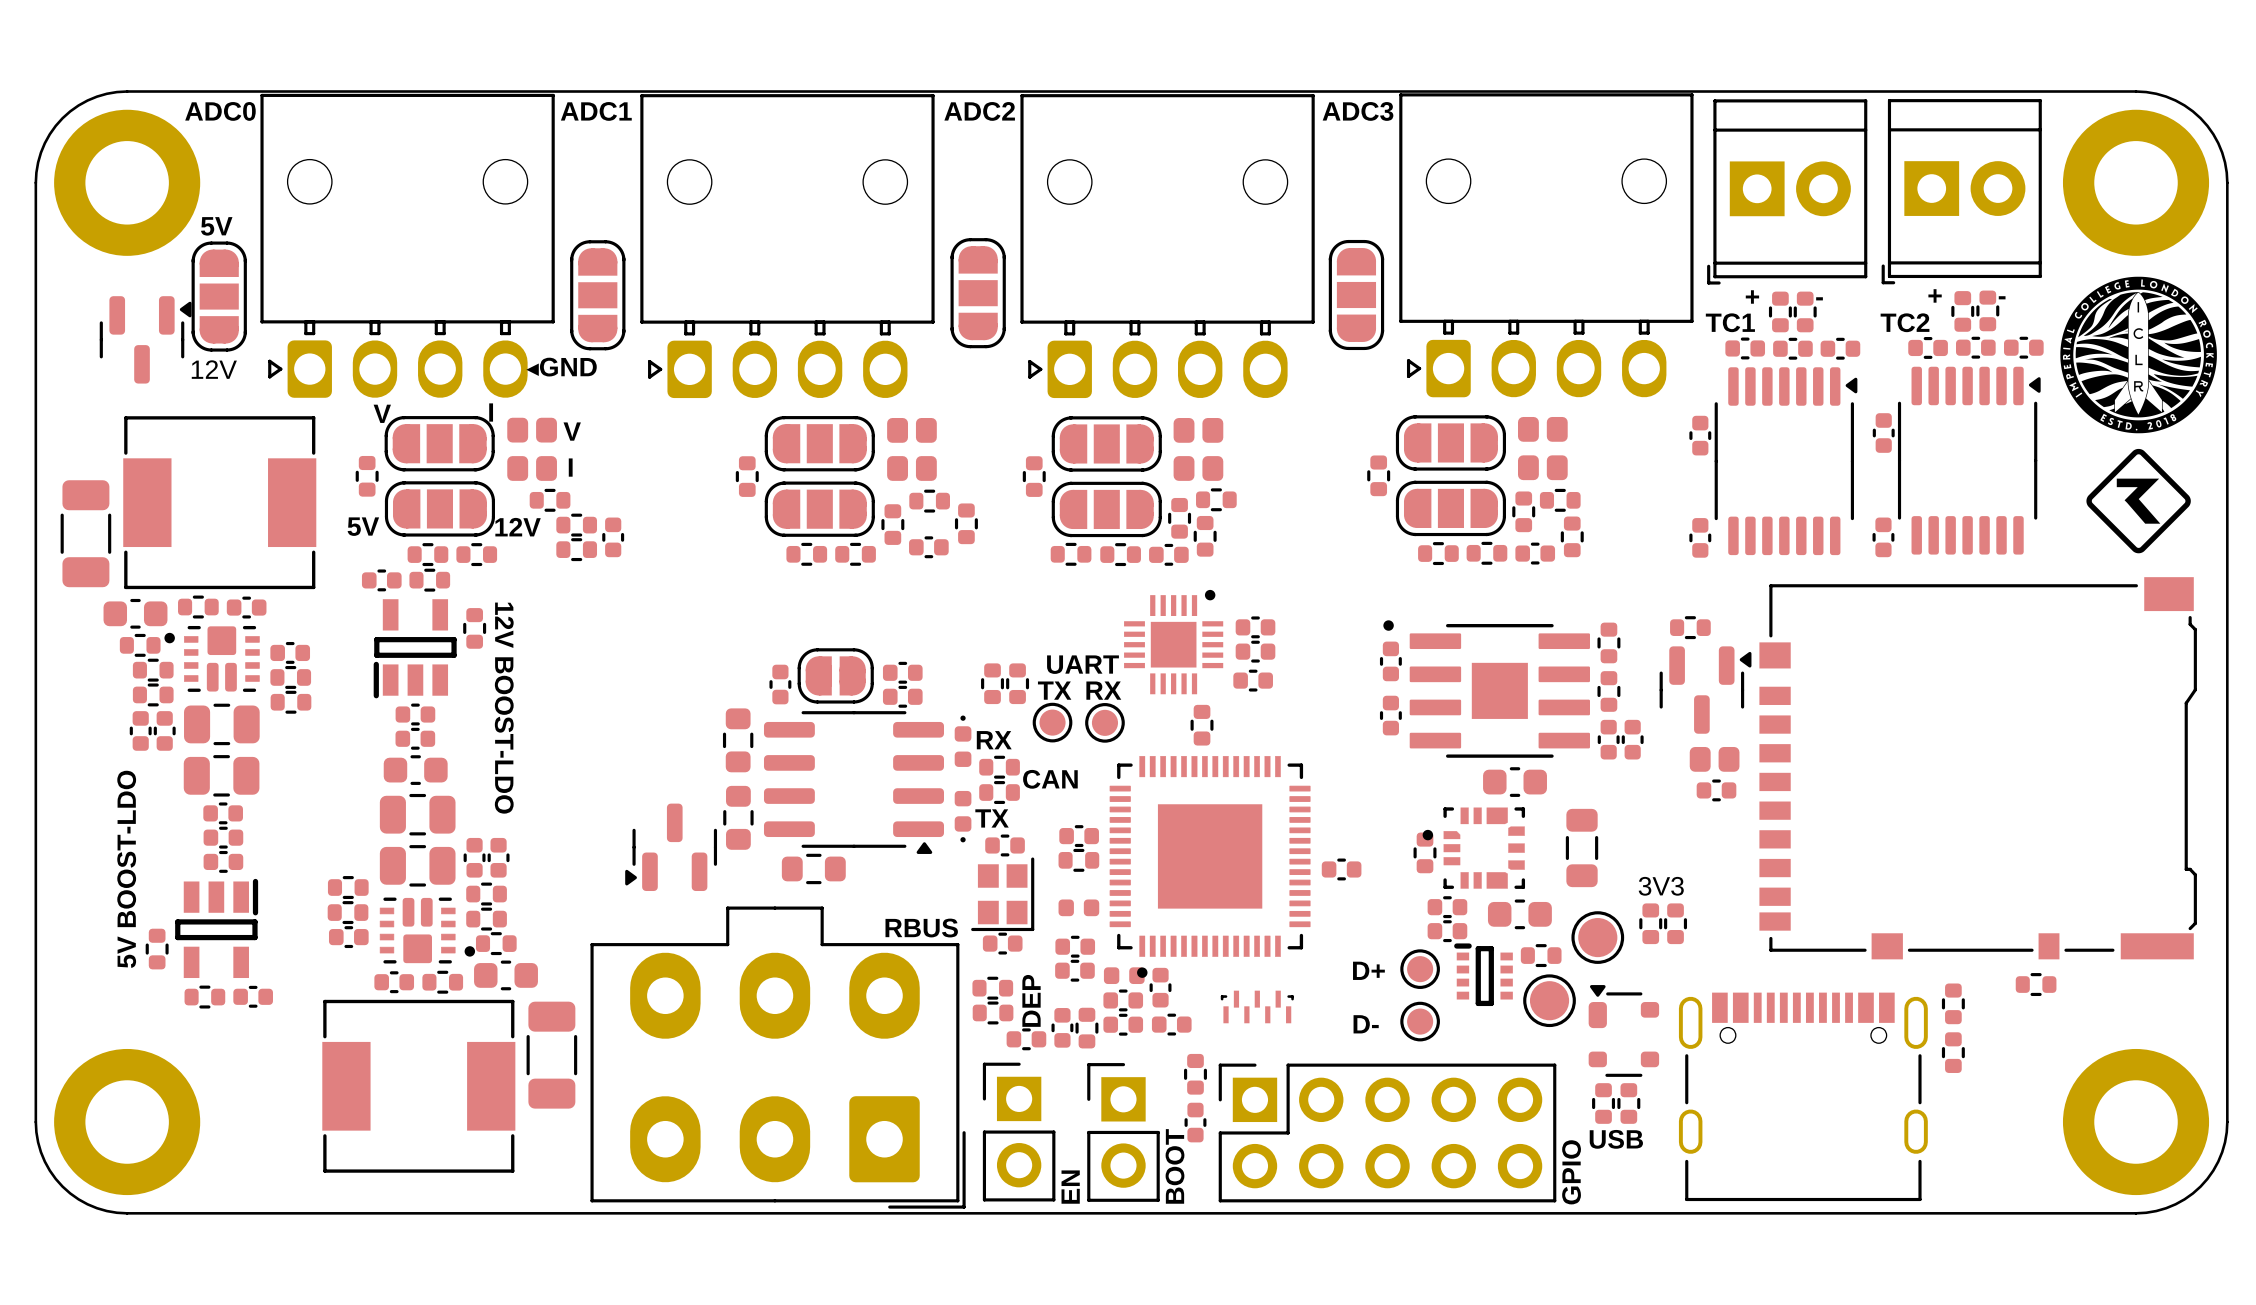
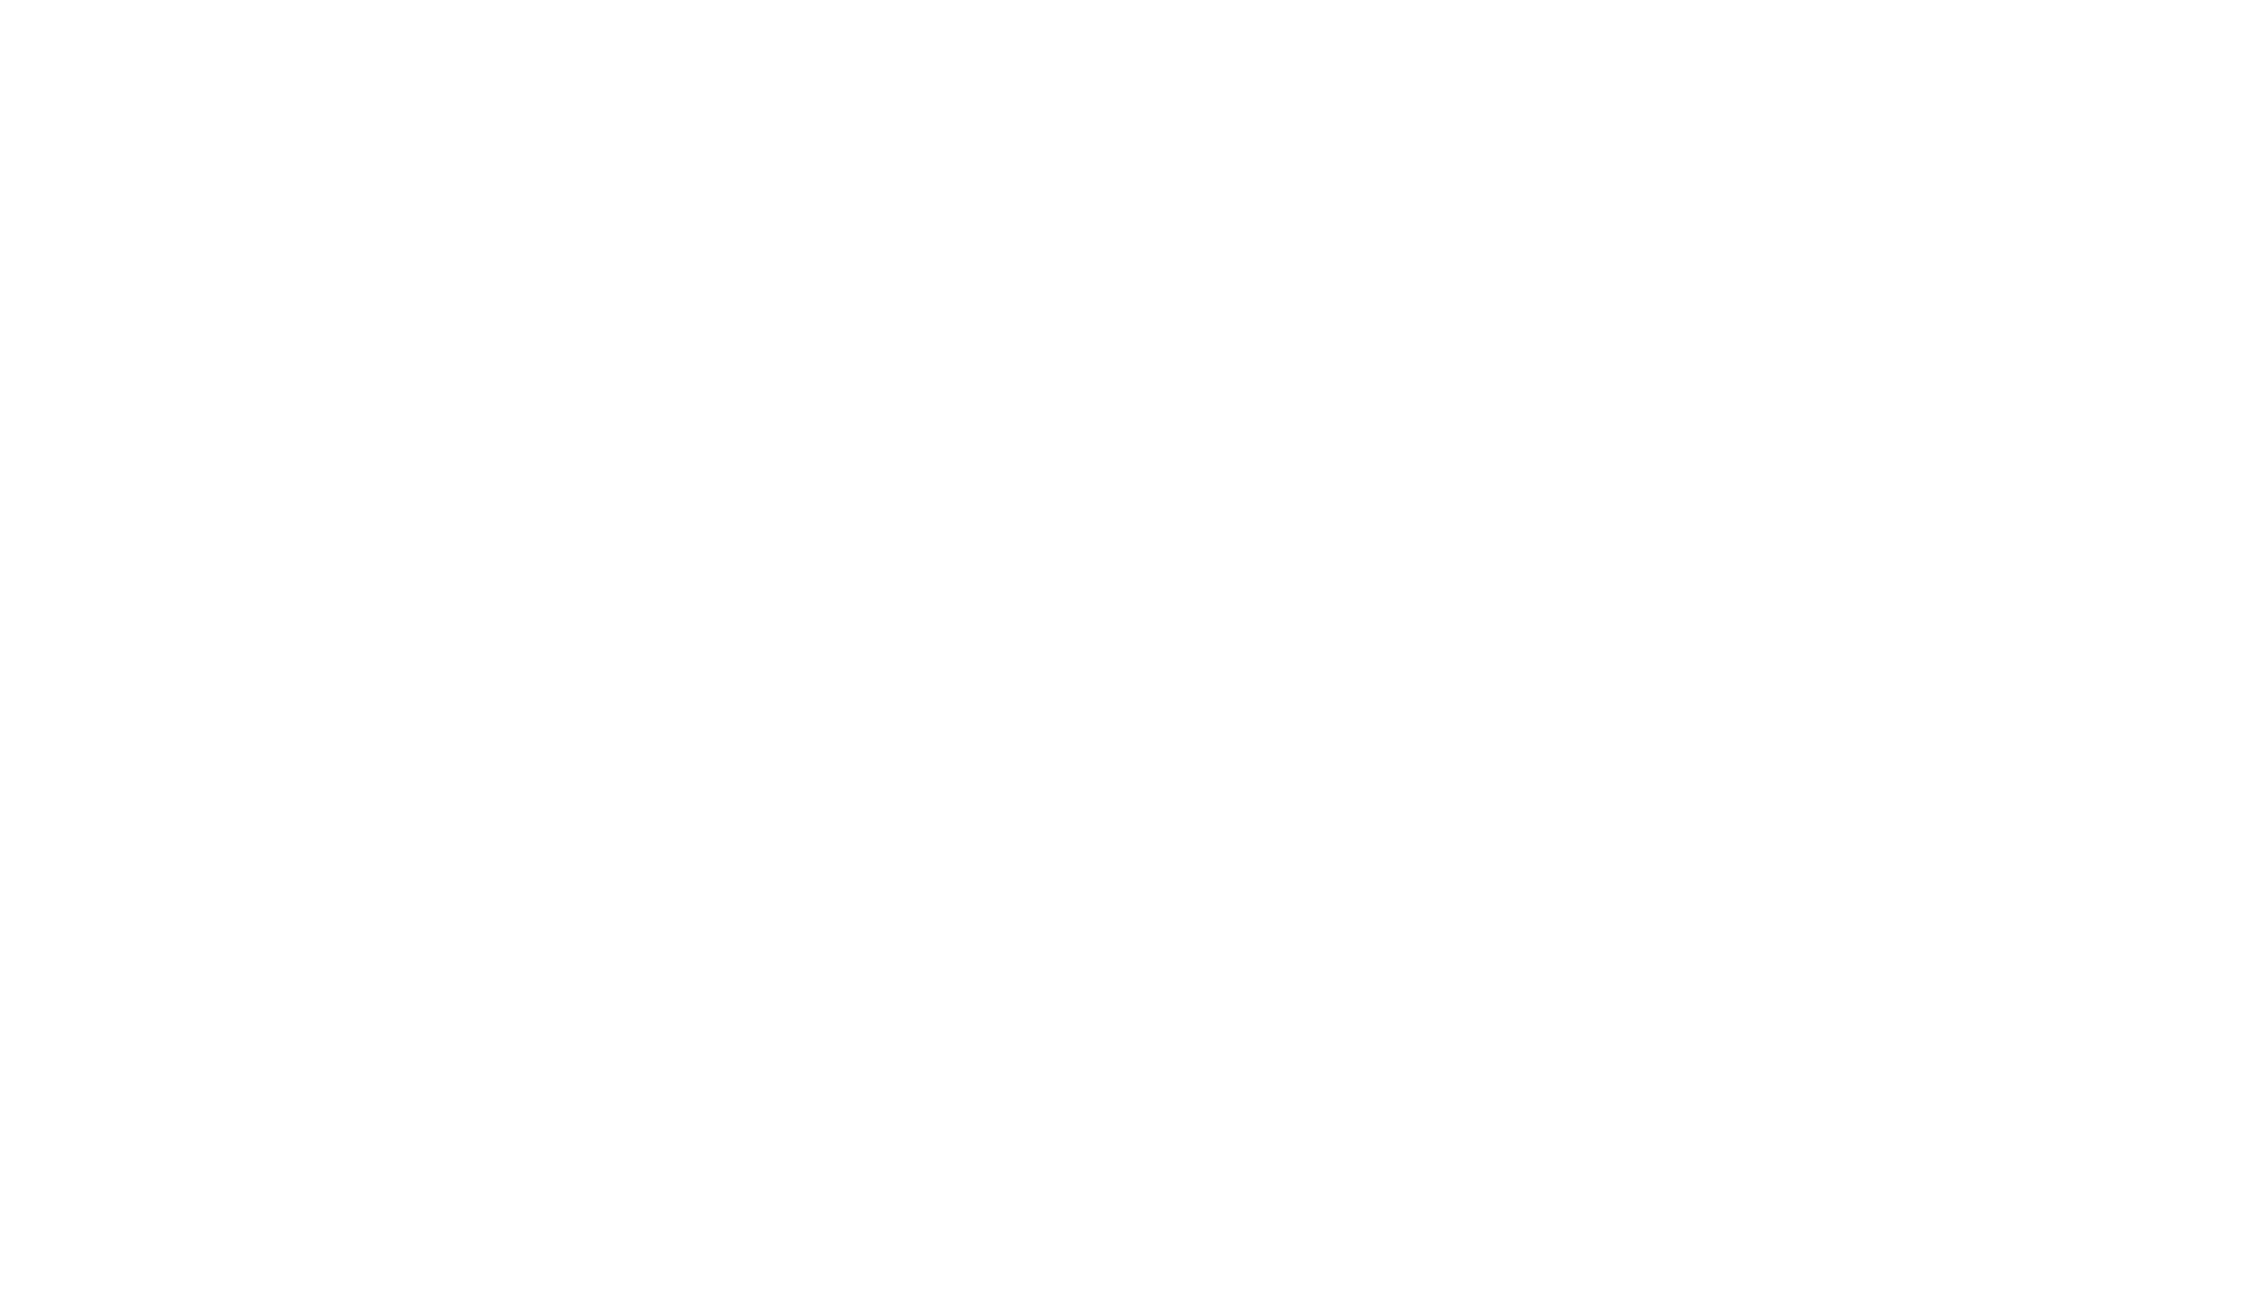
board edge: (127, 91) (2136, 91) (2156, 93) (2175, 100) (2200, 118) (2213, 134) (2225, 162) (2227, 182) (2227, 1122) (2225, 1142) (2218, 1161) (2207, 1178) (2184, 1199) (2166, 1208) (2136, 1213) (127, 1213) (106, 1211) (87, 1204) (70, 1193) (49, 1170) (40, 1152) (35, 1122) (35, 182) (38, 162) (44, 143) (62, 118) (87, 100) (106, 93) (127, 91) -> none
text: ADC0 (220, 111) -> none
text: ADC1 (596, 111) -> none
text: ADC2 (979, 111) -> none
text: ADC3 (1358, 111) -> none
part: (127, 182) -> none
part: (2136, 182) -> none
part: (1787, 191) -> none
part: (1961, 191) -> none
text: 5V (216, 226) -> none
part: (407, 245) -> none
part: (1546, 245) -> none
part: (787, 246) -> none
part: (1167, 246) -> none
drawing: [2060, 276, 2217, 554] -> none
part: (978, 293) -> none
part: (1356, 294) -> none
part: (597, 295) -> none
text: + (1935, 295) -> none
part: (219, 296) -> none
text: + (1752, 296) -> none
text: - (2002, 297) -> none
text: - (1819, 298) -> none
part: (1987, 310) -> none
part: (1780, 311) -> none
part: (1805, 311) -> none
part: (1962, 311) -> none
text: TC1 (1730, 322) -> none
text: TC2 (1905, 322) -> none
part: (145, 339) -> none
part: (1928, 347) -> none
part: (1975, 347) -> none
part: (2023, 347) -> none
part: (1745, 348) -> none
part: (1792, 348) -> none
part: (1840, 348) -> none
text: ◂GND (561, 367) -> none
text: 12V (214, 369) -> none
text: I (491, 412) -> none
text: V (382, 413) -> none
part: (1542, 429) -> none
part: (532, 430) -> none
part: (911, 430) -> none
part: (1198, 430) -> none
text: V (572, 431) -> none
part: (1883, 433) -> none
part: (1700, 435) -> none
part: (1450, 442) -> none
part: (439, 443) -> none
part: (819, 443) -> none
part: (1106, 443) -> none
part: (1969, 460) -> none
part: (1786, 461) -> none
text: I (570, 467) -> none
part: (1542, 467) -> none
part: (532, 468) -> none
part: (911, 468) -> none
part: (1198, 468) -> none
part: (1378, 475) -> none
part: (367, 476) -> none
part: (747, 476) -> none
part: (1034, 476) -> none
part: (1216, 499) -> none
part: (550, 500) -> none
part: (1560, 500) -> none
part: (929, 501) -> none
part: (219, 502) -> none
part: (439, 508) -> none
part: (1450, 508) -> none
part: (819, 509) -> none
part: (1106, 509) -> none
part: (1523, 511) -> none
part: (1179, 518) -> none
part: (966, 523) -> none
part: (892, 524) -> none
part: (576, 525) -> none
text: 5V (363, 526) -> none
text: 12V (518, 527) -> none
part: (85, 533) -> none
part: (1205, 536) -> none
part: (1572, 536) -> none
part: (613, 537) -> none
part: (1700, 537) -> none
part: (1883, 537) -> none
part: (928, 547) -> none
part: (576, 549) -> none
part: (1438, 553) -> none
part: (1486, 553) -> none
part: (1535, 553) -> none
part: (427, 554) -> none
part: (476, 554) -> none
part: (806, 554) -> none
part: (855, 554) -> none
part: (1071, 554) -> none
part: (1120, 554) -> none
part: (1168, 554) -> none
part: (381, 580) -> none
part: (429, 580) -> none
part: (198, 607) -> none
part: (246, 607) -> none
part: (135, 613) -> none
part: (1255, 627) -> none
part: (1690, 627) -> none
part: (474, 628) -> none
part: (1173, 642) -> none
part: (1608, 642) -> none
part: (140, 645) -> none
part: (415, 648) -> none
part: (1255, 651) -> none
part: (290, 652) -> none
part: (212, 658) -> none
part: (1390, 661) -> none
text: UART (1083, 664) -> none
part: (153, 670) -> none
part: (902, 672) -> none
part: (835, 675) -> none
part: (290, 677) -> none
part: (1253, 680) -> none
part: (992, 683) -> none
part: (1017, 683) -> none
part: (780, 684) -> none
part: (1486, 689) -> none
text: TX (1054, 690) -> none
text: RX (1103, 690) -> none
part: (1705, 690) -> none
part: (1608, 691) -> none
part: (153, 694) -> none
part: (902, 696) -> none
part: (290, 702) -> none
text: 12V BOOST-LDO (504, 708) -> none
part: (415, 714) -> none
part: (1390, 715) -> none
part: (1052, 722) -> none
part: (1104, 722) -> none
part: (221, 724) -> none
part: (1202, 725) -> none
part: (140, 730) -> none
part: (164, 730) -> none
part: (415, 738) -> none
part: (1608, 739) -> none
part: (1632, 739) -> none
part: (738, 740) -> none
text: RX (994, 740) -> none
part: (963, 741) -> none
part: (1714, 759) -> none
part: (999, 767) -> none
part: (1978, 768) -> none
part: (415, 770) -> none
part: (221, 775) -> none
text: CAN (1050, 779) -> none
part: (853, 782) -> none
part: (1515, 782) -> none
part: (1716, 790) -> none
part: (999, 792) -> none
part: (223, 813) -> none
part: (417, 814) -> none
part: (963, 816) -> none
part: (738, 817) -> none
text: TX (992, 818) -> none
part: (1079, 836) -> none
part: (223, 837) -> none
part: (1005, 845) -> none
part: (671, 847) -> none
part: (1473, 848) -> none
part: (1582, 848) -> none
part: (1425, 852) -> none
part: (474, 857) -> none
part: (498, 857) -> none
part: (1078, 860) -> none
part: (223, 861) -> none
part: (417, 865) -> none
part: (1210, 866) -> none
part: (813, 868) -> none
text: 5V BOOST-LDO (126, 869) -> none
part: (1341, 869) -> none
text: 3V3 (1661, 886) -> none
part: (348, 887) -> none
part: (486, 894) -> none
part: (1002, 894) -> none
part: (1078, 907) -> none
part: (1447, 907) -> none
part: (348, 912) -> none
part: (1519, 914) -> none
part: (486, 919) -> none
part: (1650, 923) -> none
part: (1675, 923) -> none
part: (216, 928) -> none
text: RBUS (921, 928) -> none
part: (427, 930) -> none
part: (1447, 931) -> none
part: (348, 937) -> none
part: (1597, 937) -> none
part: (496, 943) -> none
part: (1002, 943) -> none
part: (1075, 946) -> none
part: (157, 949) -> none
part: (1541, 955) -> none
part: (1420, 969) -> none
part: (1074, 970) -> none
text: D+ (1368, 970) -> none
part: (1483, 974) -> none
part: (506, 975) -> none
part: (1124, 975) -> none
part: (394, 982) -> none
part: (442, 982) -> none
part: (2036, 984) -> none
part: (1160, 987) -> none
part: (992, 988) -> none
part: (253, 996) -> none
part: (204, 997) -> none
text: DEP (1031, 1000) -> none
part: (1123, 1000) -> none
part: (1549, 1000) -> none
part: (1953, 1003) -> none
part: (1257, 1006) -> none
part: (993, 1012) -> none
part: (1420, 1021) -> none
part: (1123, 1024) -> none
part: (1171, 1024) -> none
text: D- (1366, 1024) -> none
part: (1062, 1027) -> none
part: (1086, 1028) -> none
part: (1623, 1030) -> none
part: (1026, 1039) -> none
part: (1953, 1052) -> none
part: (551, 1055) -> none
part: (778, 1057) -> none
part: (1195, 1074) -> none
part: (418, 1086) -> none
part: (1803, 1096) -> none
part: (1603, 1103) -> none
part: (1628, 1103) -> none
part: (127, 1122) -> none
part: (1195, 1122) -> none
part: (2136, 1122) -> none
part: (1019, 1132) -> none
part: (1123, 1132) -> none
part: (1387, 1132) -> none
text: USB (1616, 1139) -> none
text: BOOT (1174, 1166) -> none
text: GPIO (1571, 1172) -> none
text: EN (1070, 1187) -> none

